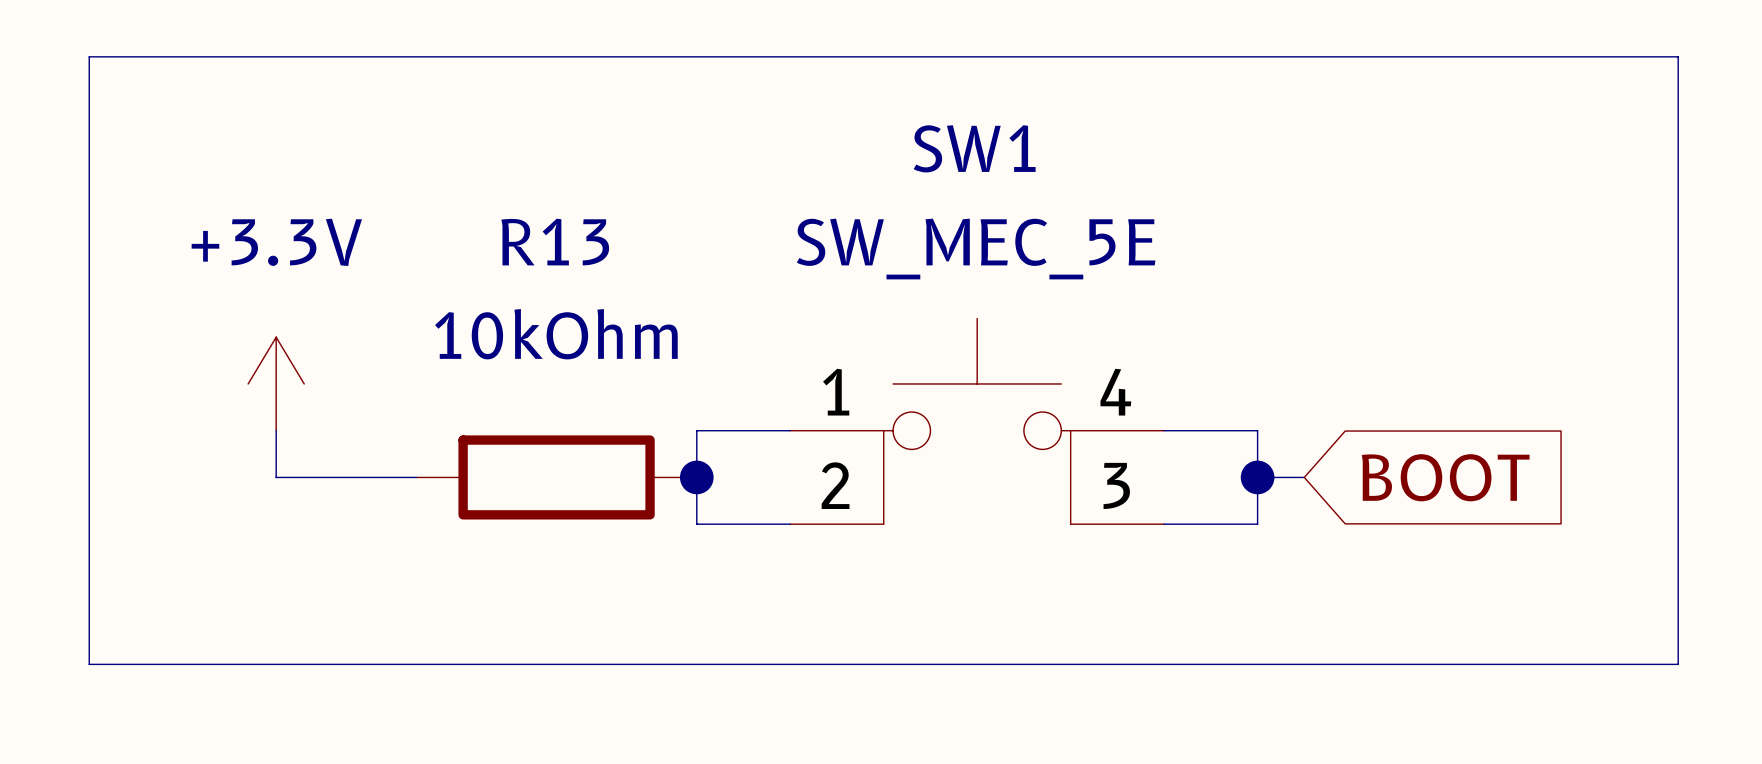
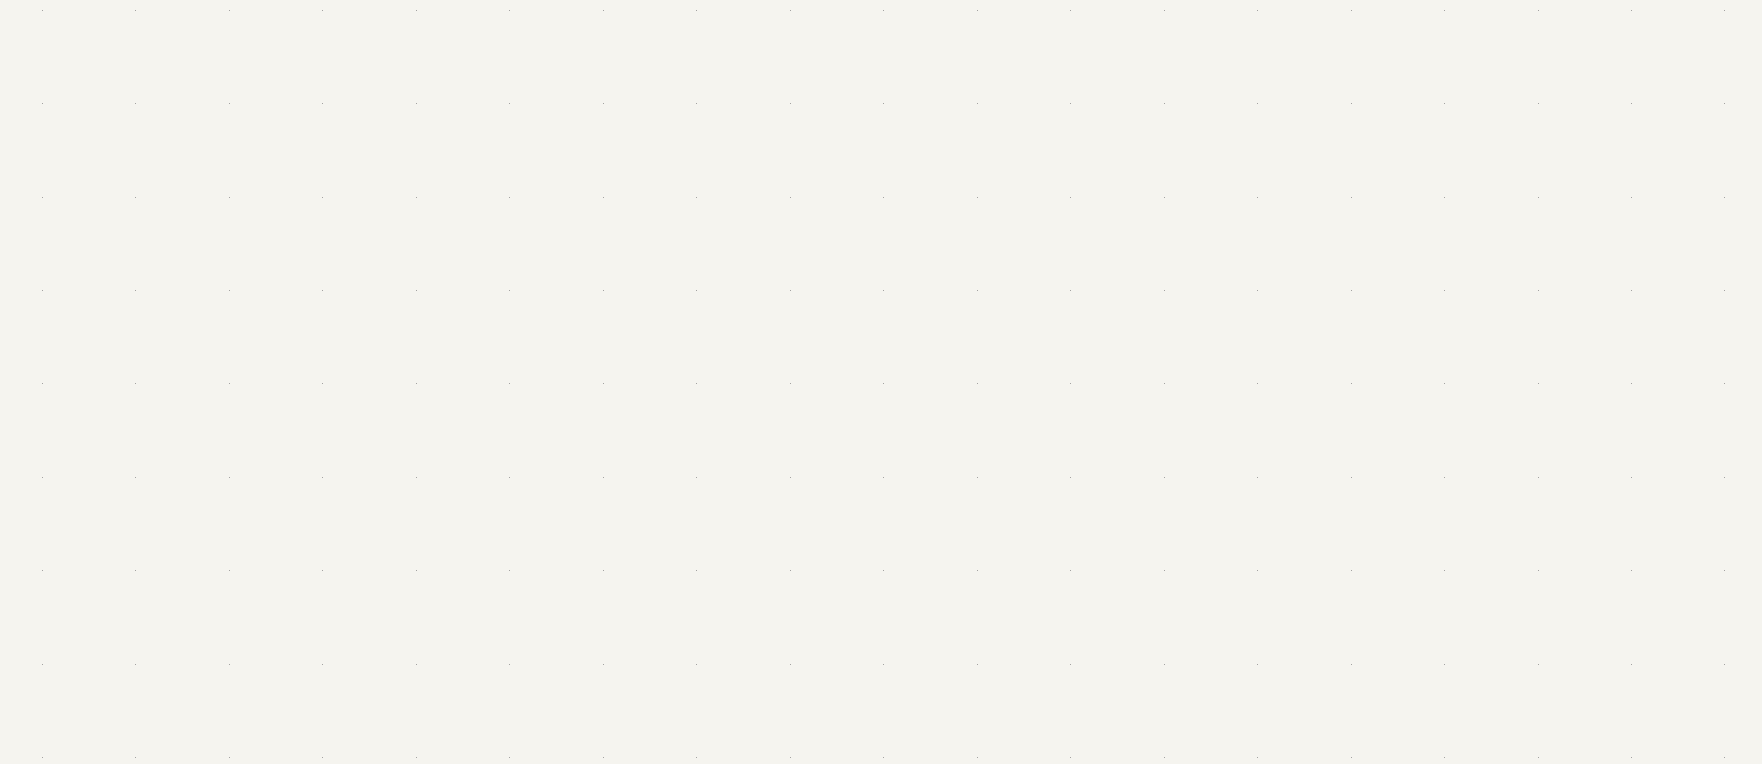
line: (89, 56) (1678, 56) (1678, 664) (89, 664) (89, 56) -> none
power symbol: +3.3V (276, 383) -> none
SW1: SW_MEC_5E (977, 421) -> none
wire: (276, 430) (276, 477) (416, 477) -> none
wire: (790, 430) (696, 430) (696, 524) (790, 524) -> none
wire: (1164, 430) (1257, 430) (1257, 524) (1164, 524) -> none
R13: 10kOhm (556, 477) -> none
junction: (696, 477) -> none
wire: (1257, 477) (1304, 477) -> none
junction: (1257, 477) -> none
global label: BOOT (1445, 477) -> none

